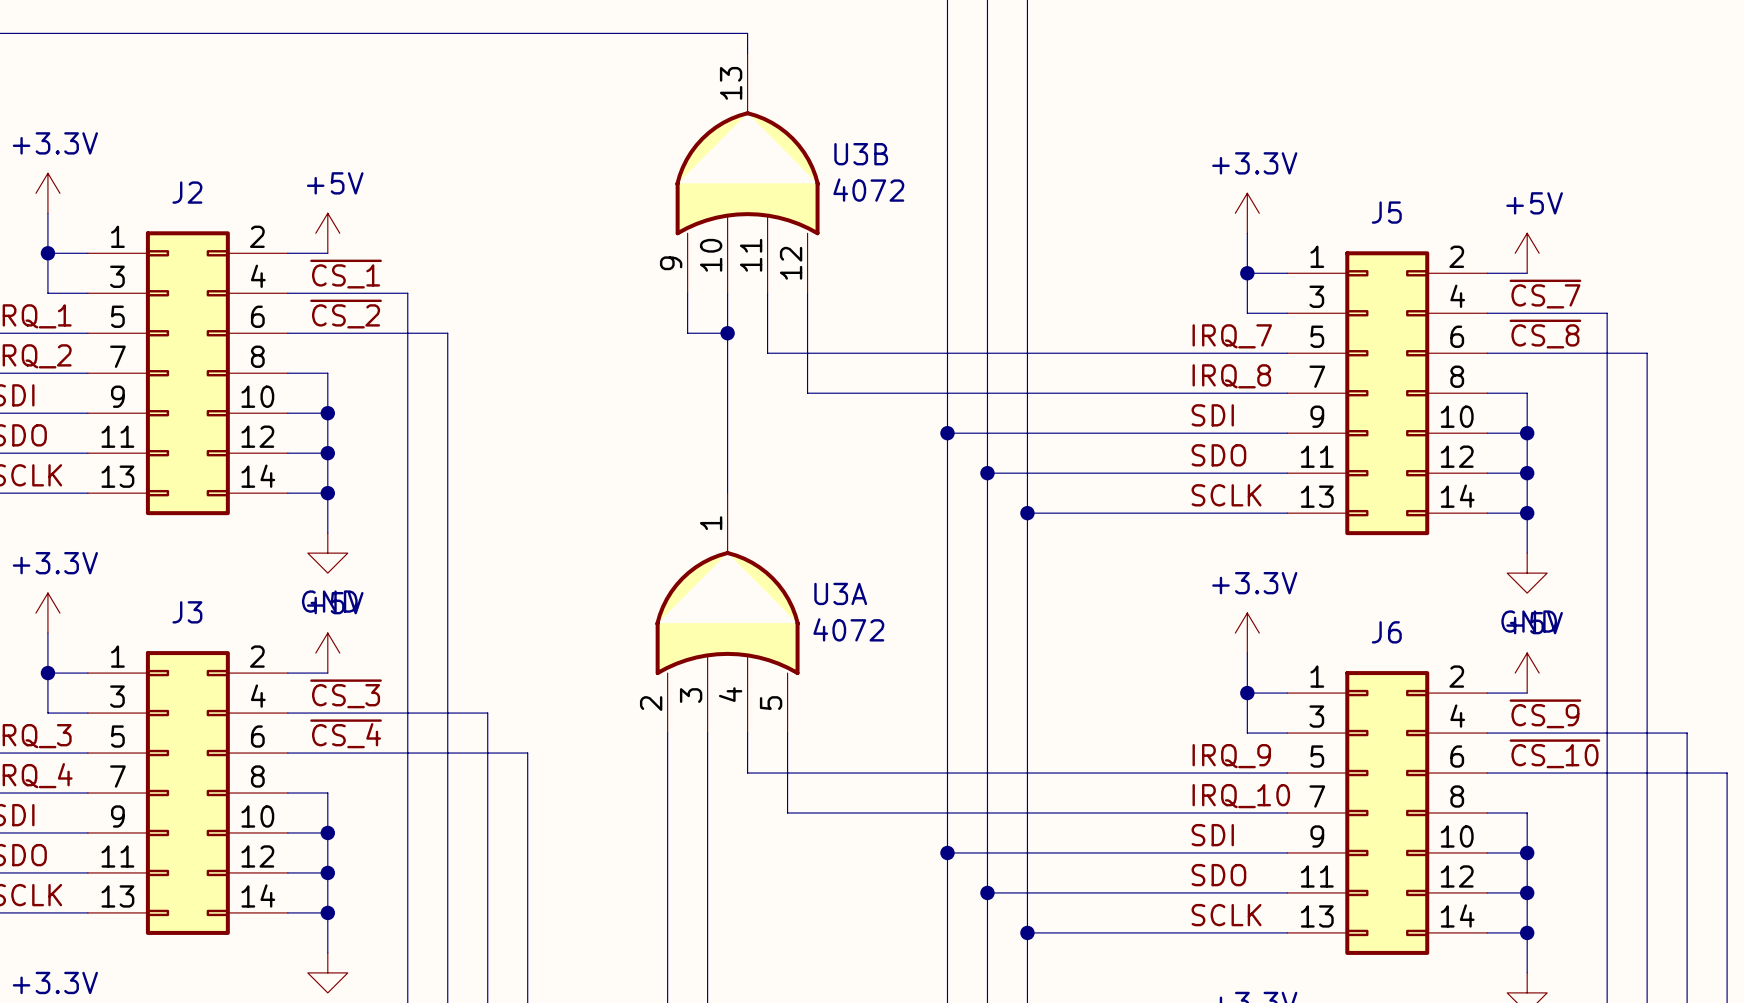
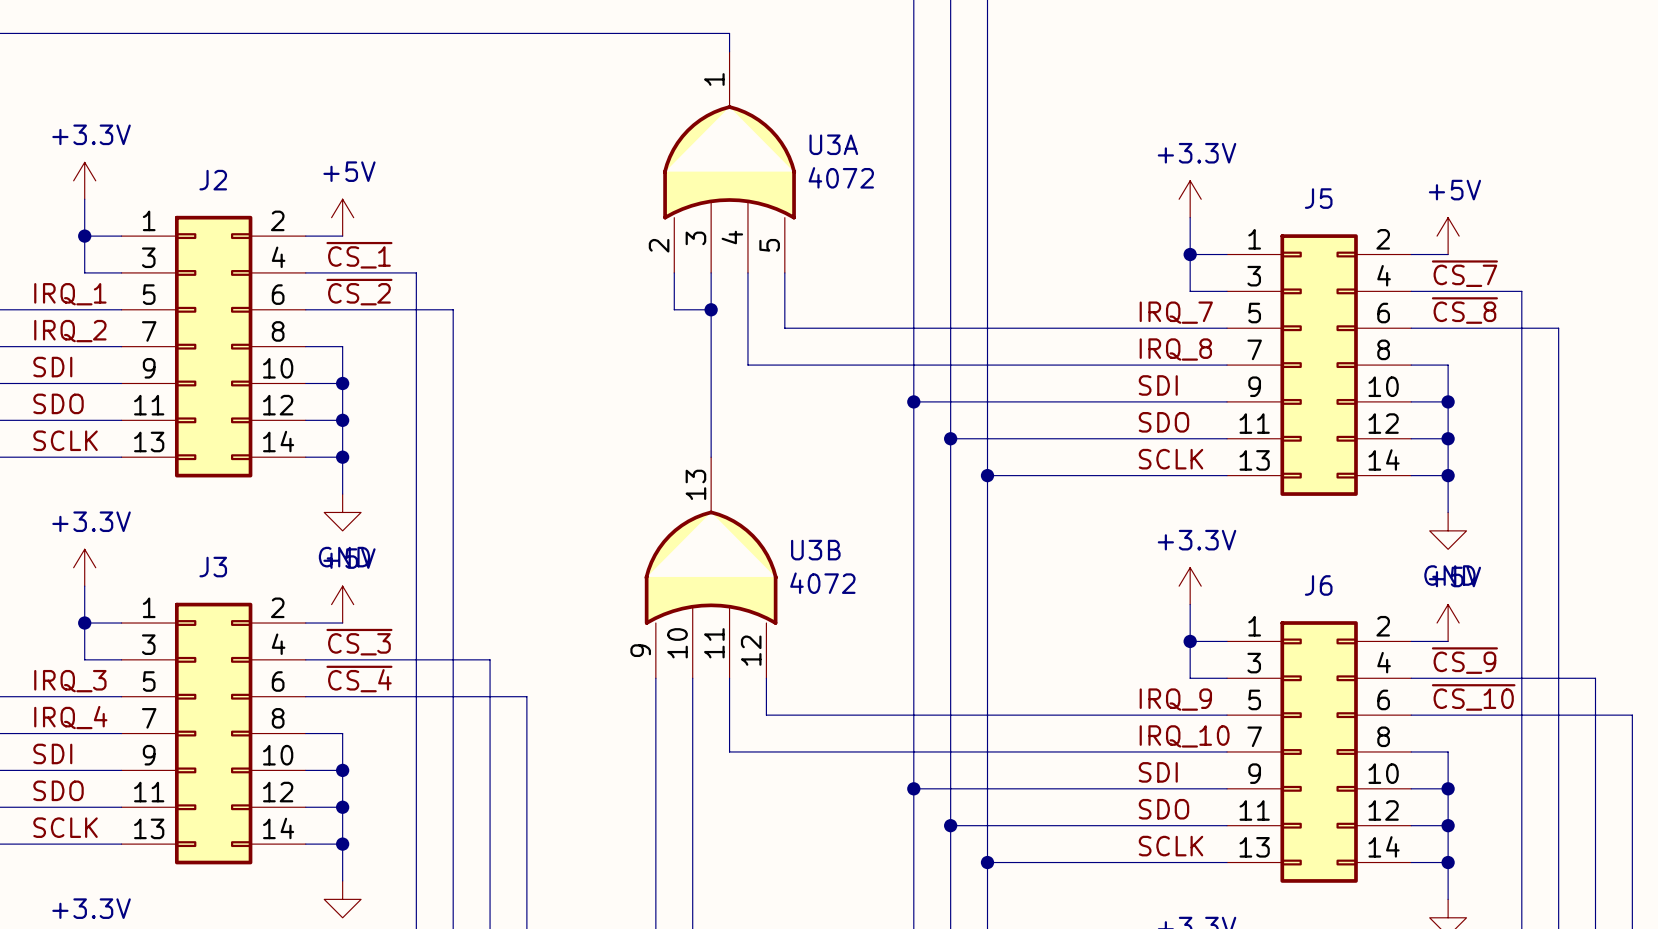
U3B position: (747, 173) -> (711, 567)
wire: (767, 353) (807, 353) (807, 393) -> (747, 328) (747, 365) (784, 365)
U3A position: (727, 613) -> (729, 162)
wire: (747, 773) (787, 773) (787, 812) -> (729, 715) (729, 751) (766, 751)

